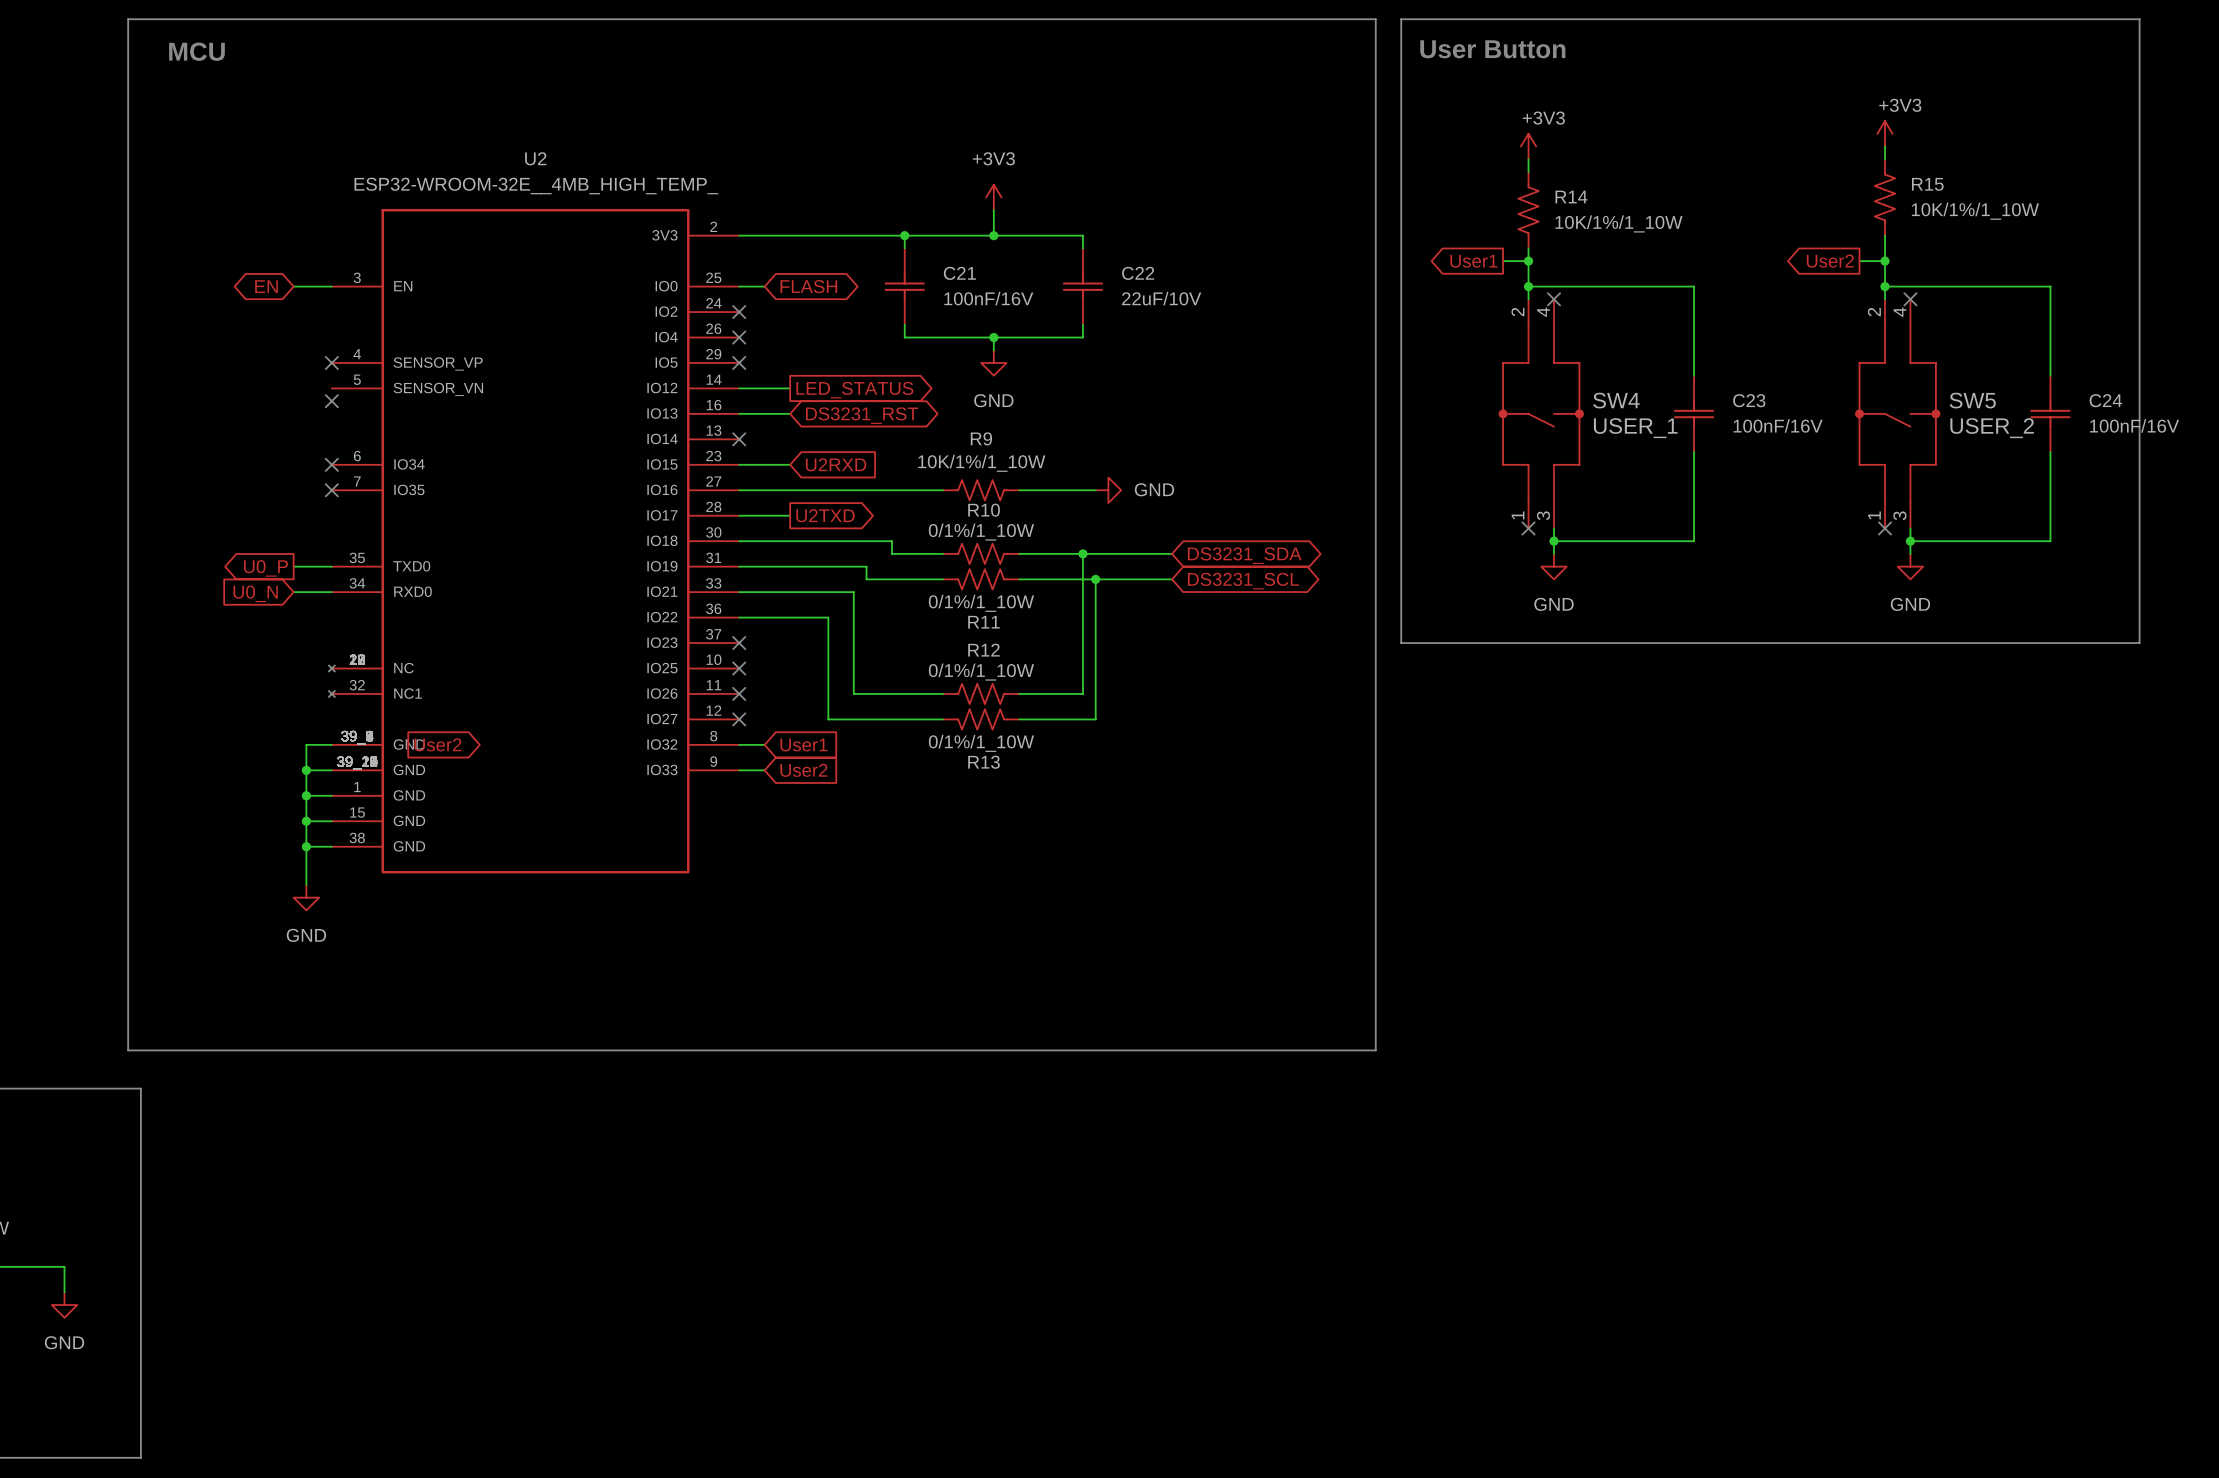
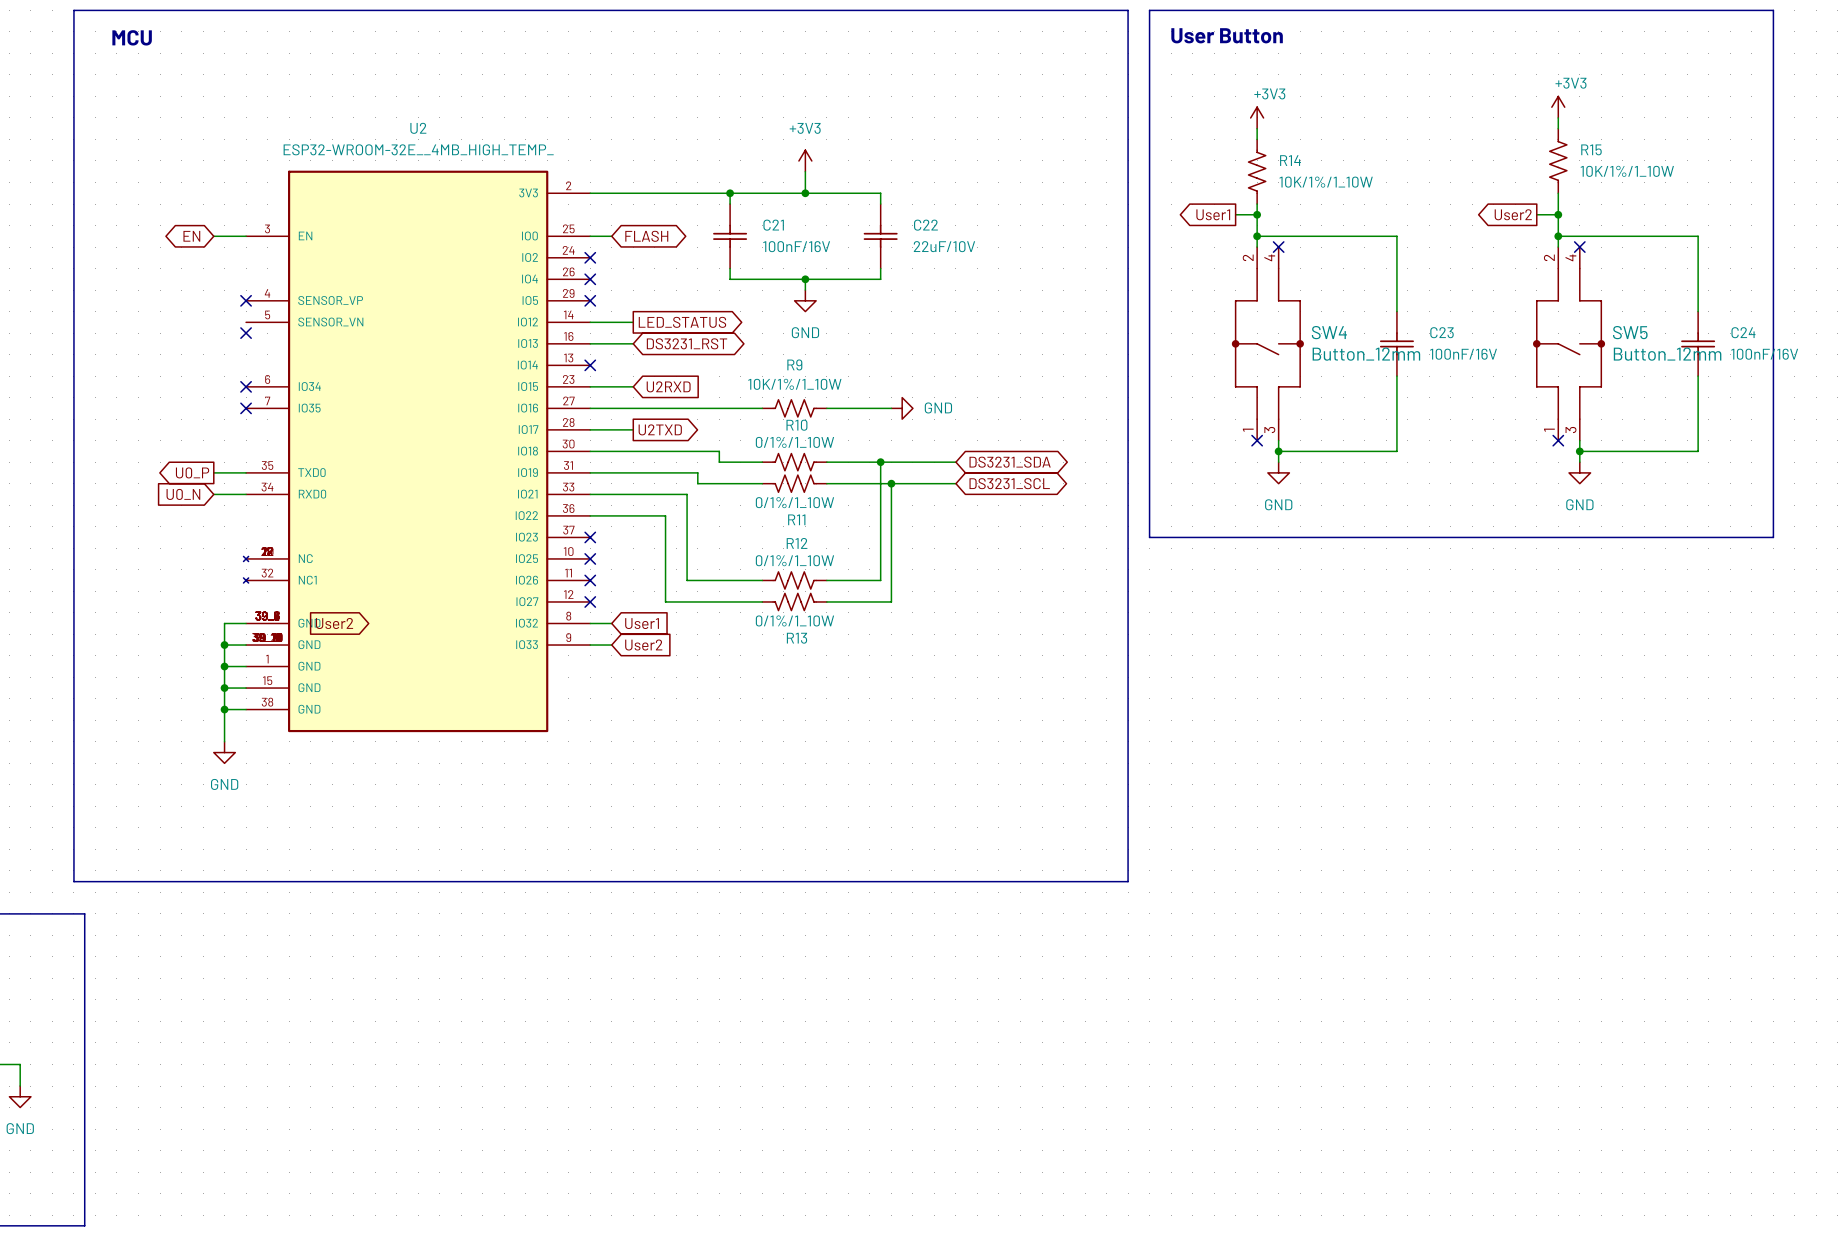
SW4 value: USER_1 (1635, 428) -> Button_12mm (1366, 354)
SW5 value: USER_2 (1992, 428) -> Button_12mm (1667, 354)

